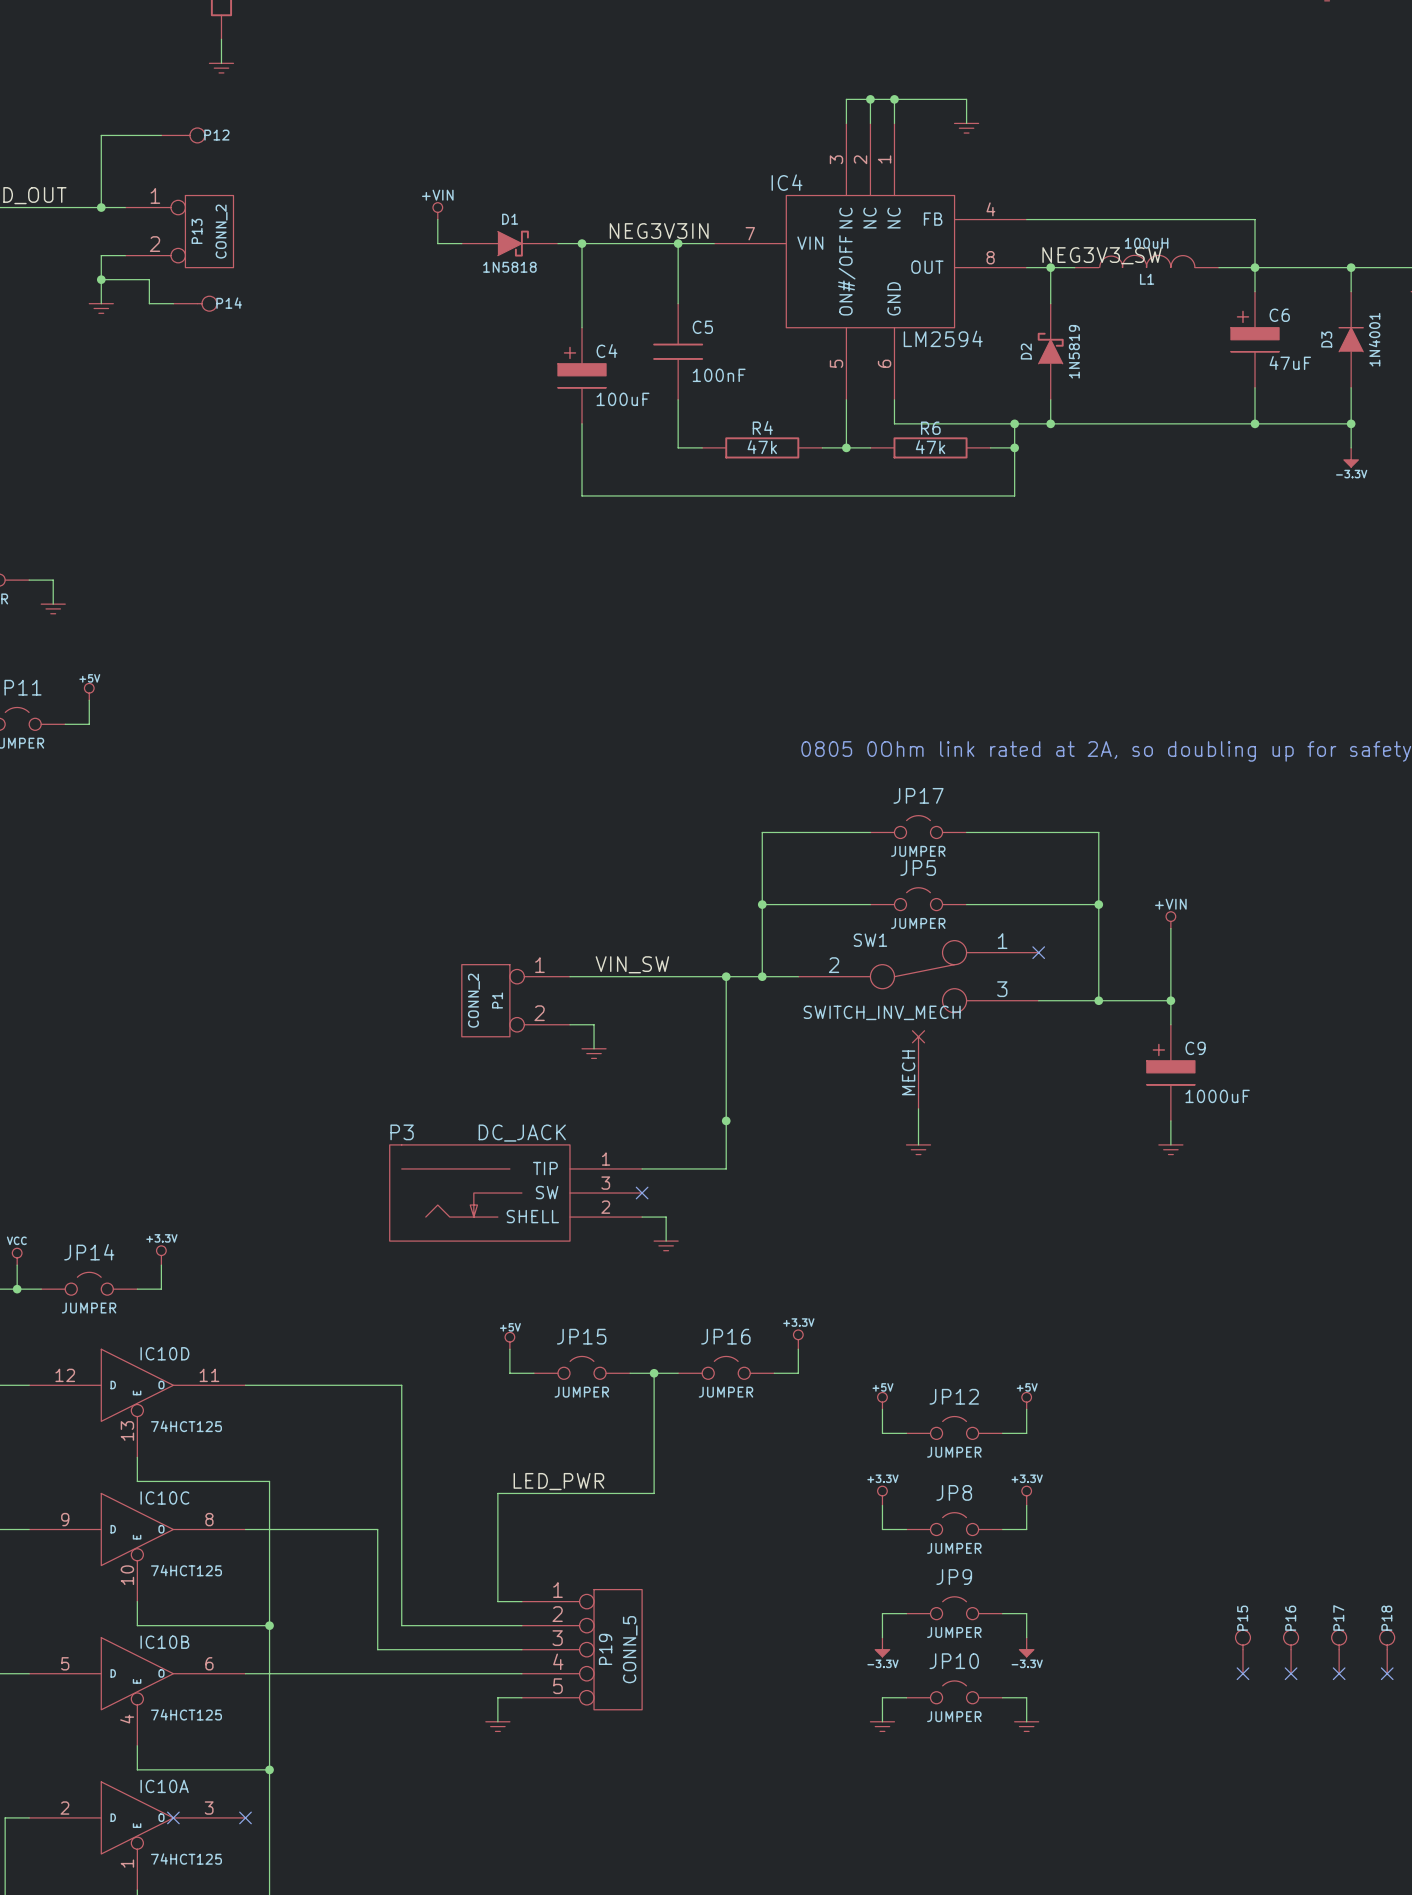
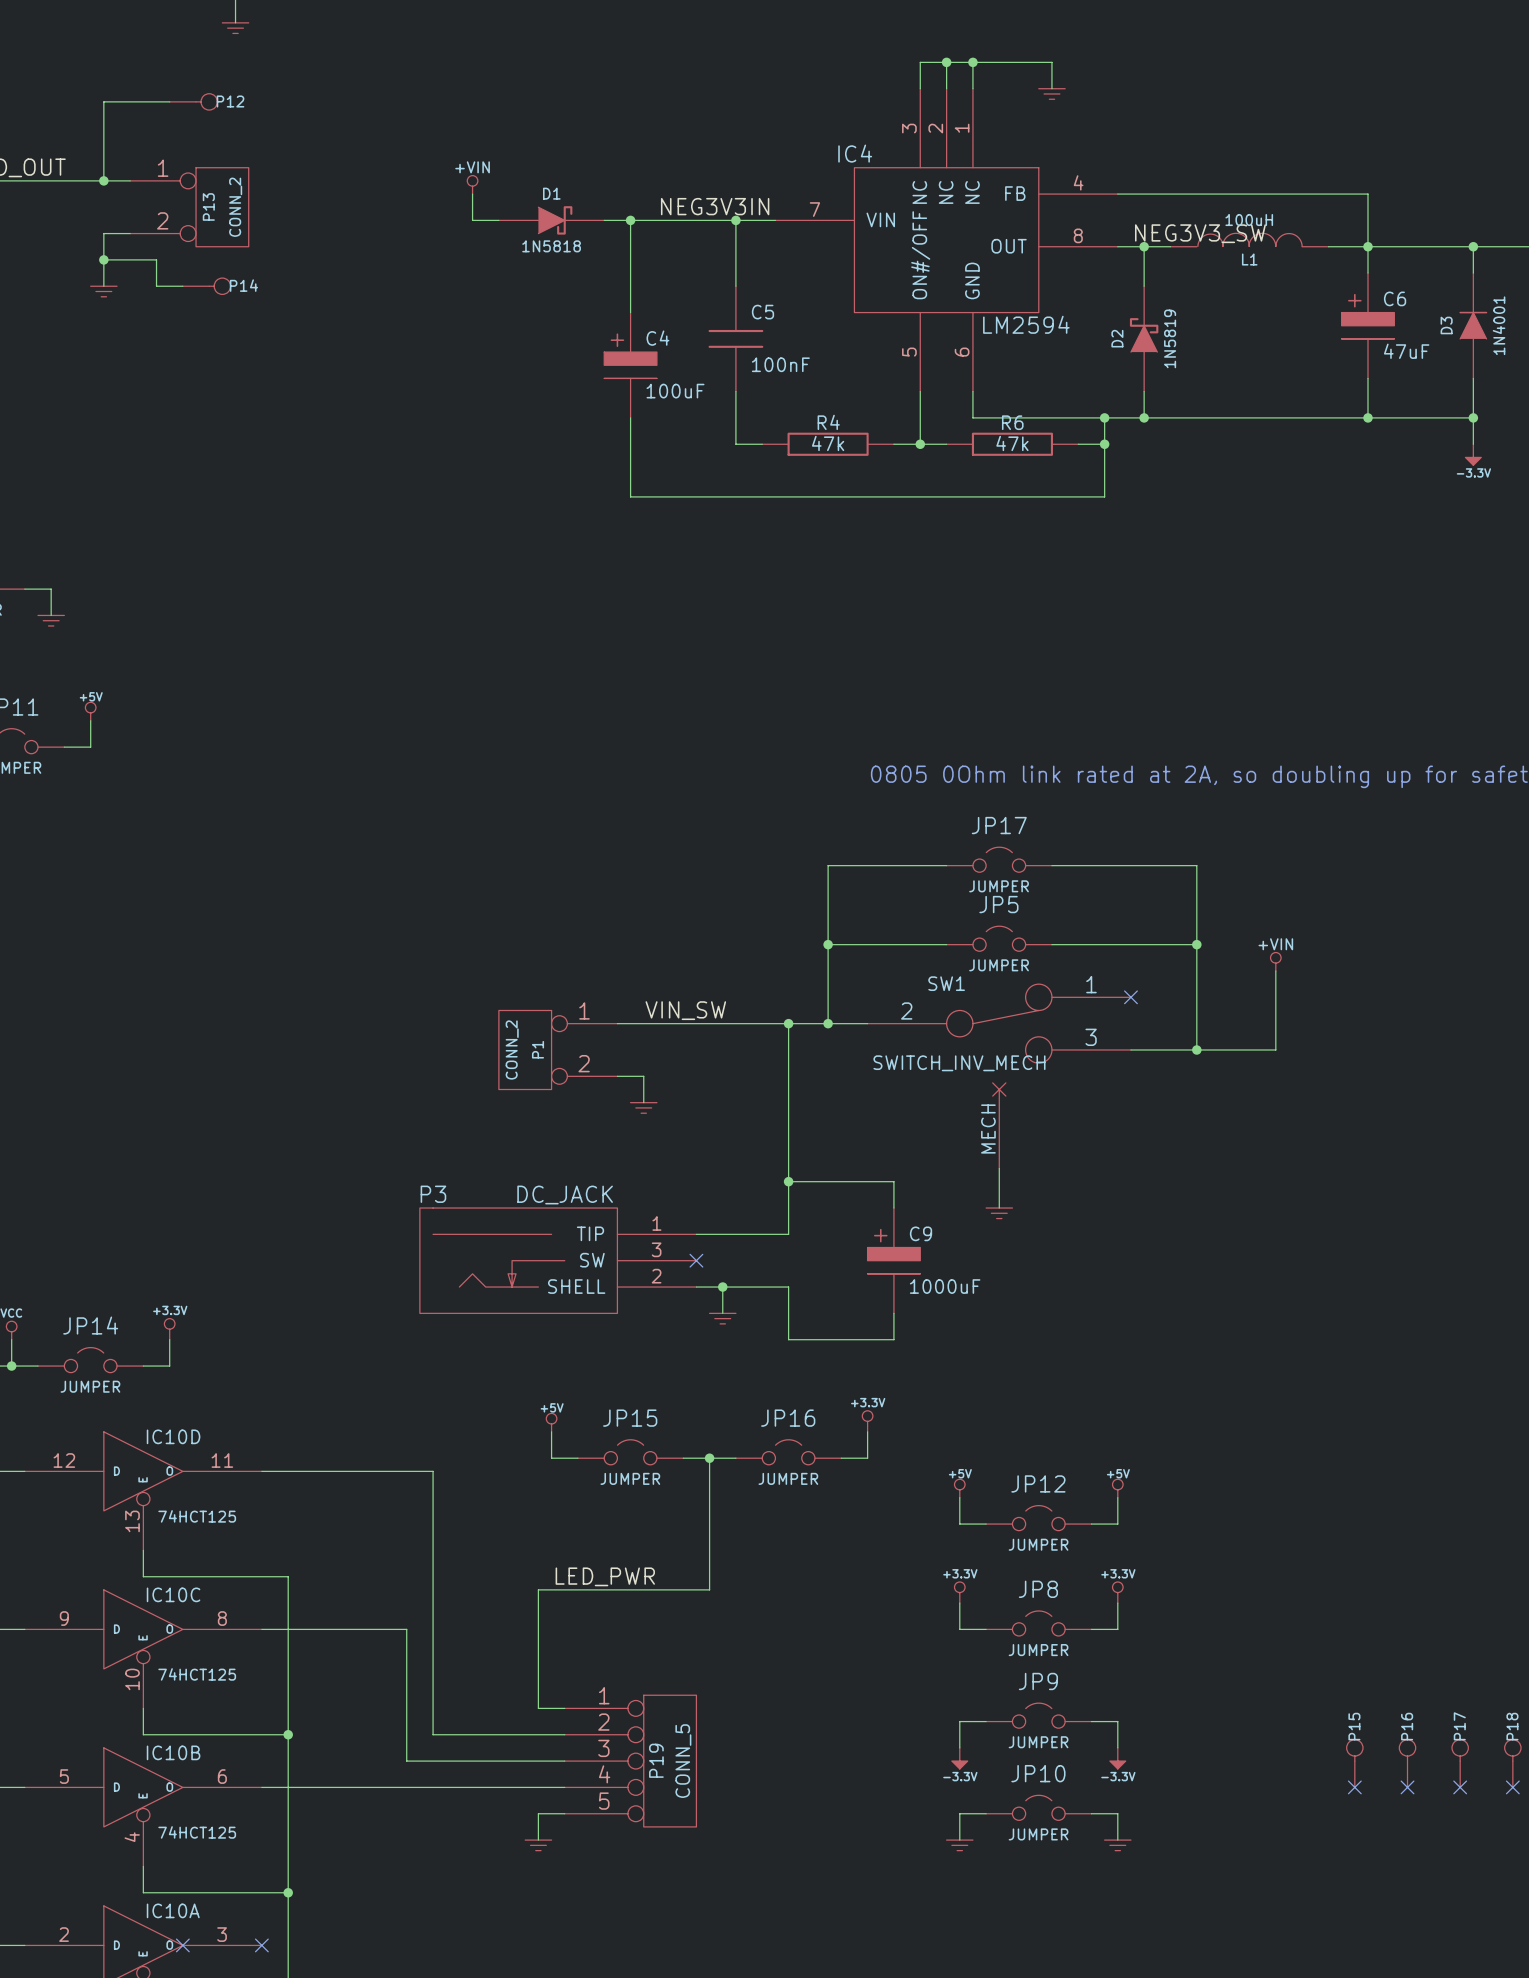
wire: (1170, 1000) (1170, 1024) -> none
junction: (1170, 1000) -> none
C9 position: (1170, 1072) -> (893, 1260)
wire: none -> (788, 1181) (893, 1181) (893, 1208)
wire: (1170, 1120) (1170, 1144) -> none
power symbol: (1170, 1149) -> none
wire: none -> (722, 1287) (788, 1287) (788, 1339) (893, 1339) (893, 1313)
junction: none -> (722, 1287)

